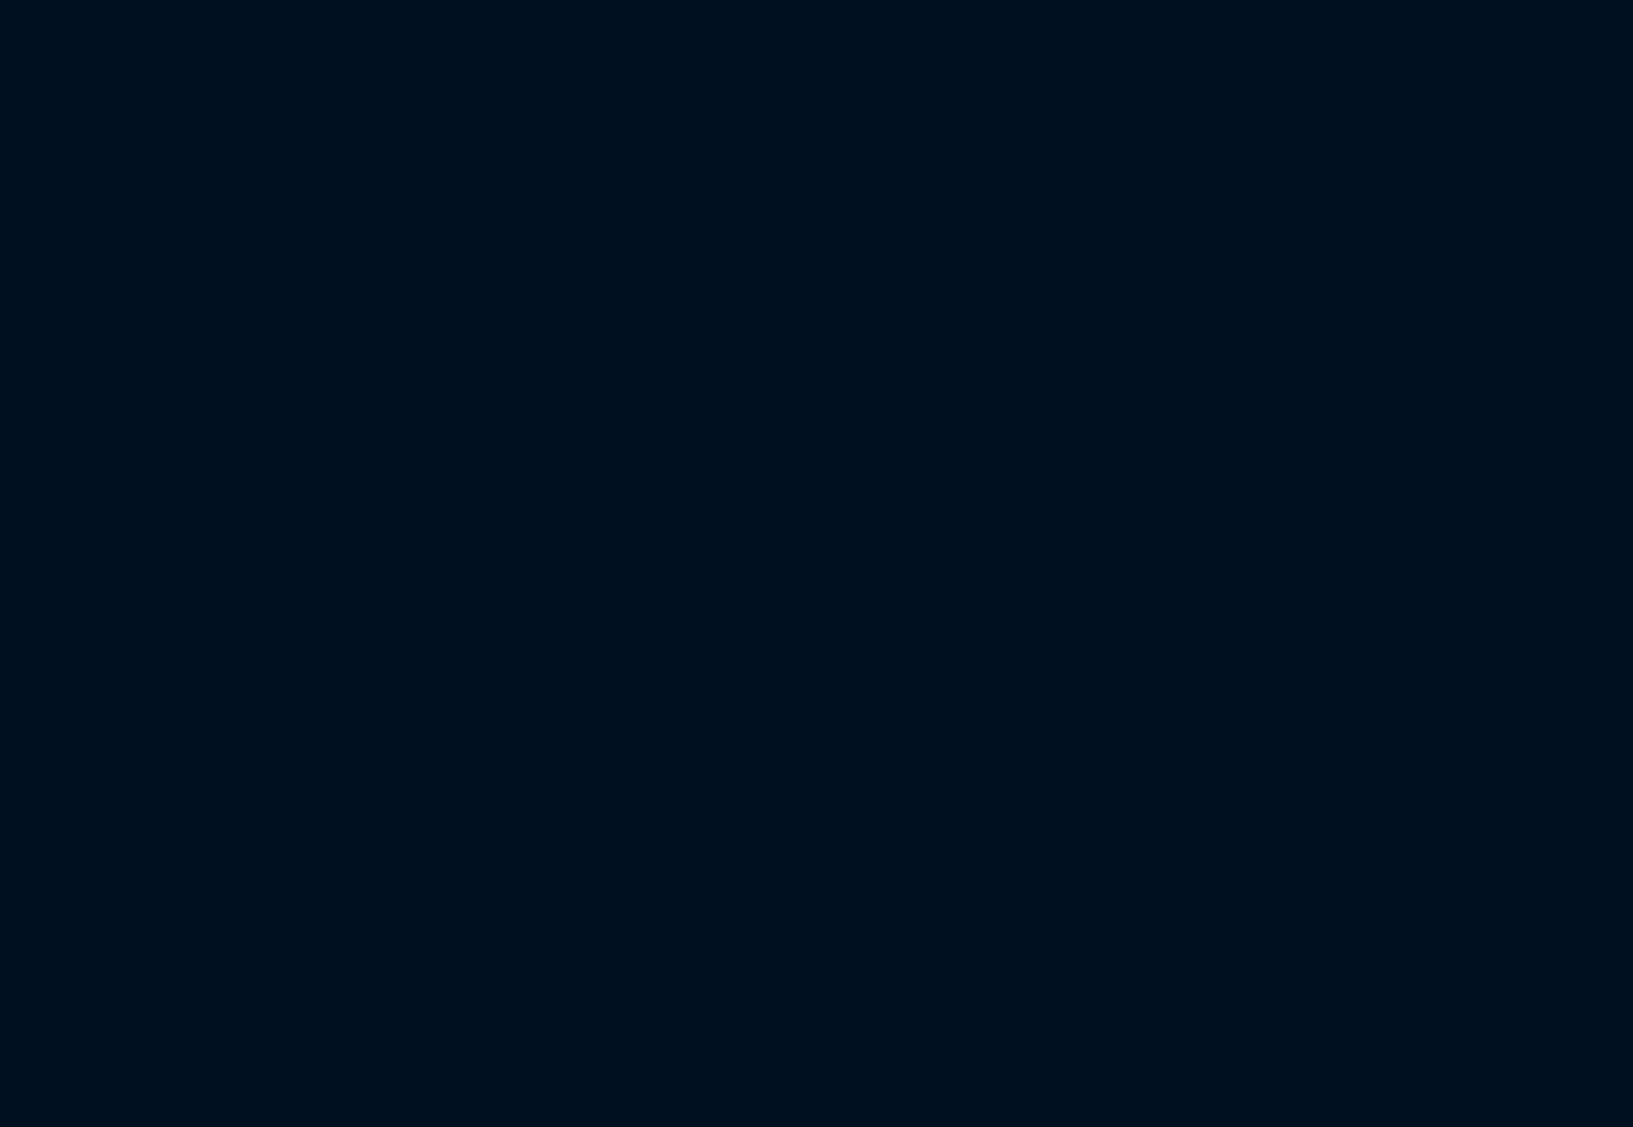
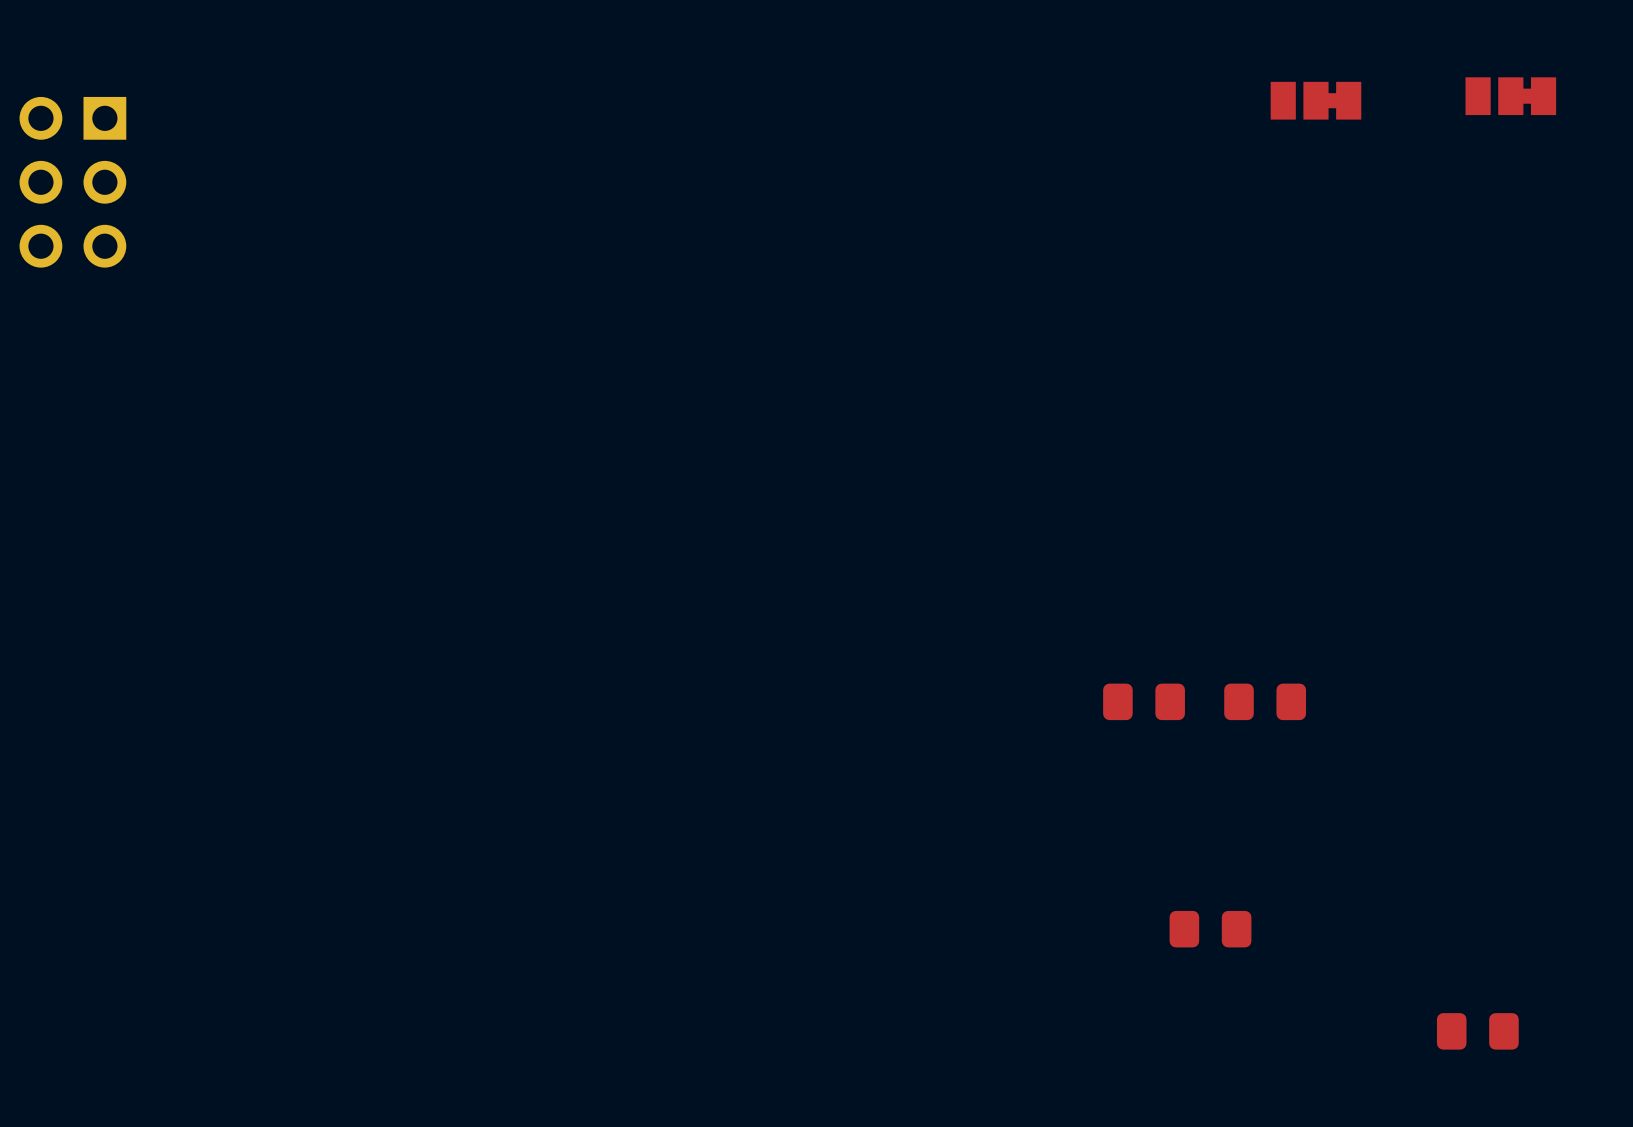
part: none -> (1510, 96)
part: none -> (1315, 100)
part: none -> (72, 182)
part: none -> (1144, 701)
part: none -> (1265, 701)
part: none -> (1210, 929)
part: none -> (1477, 1031)

